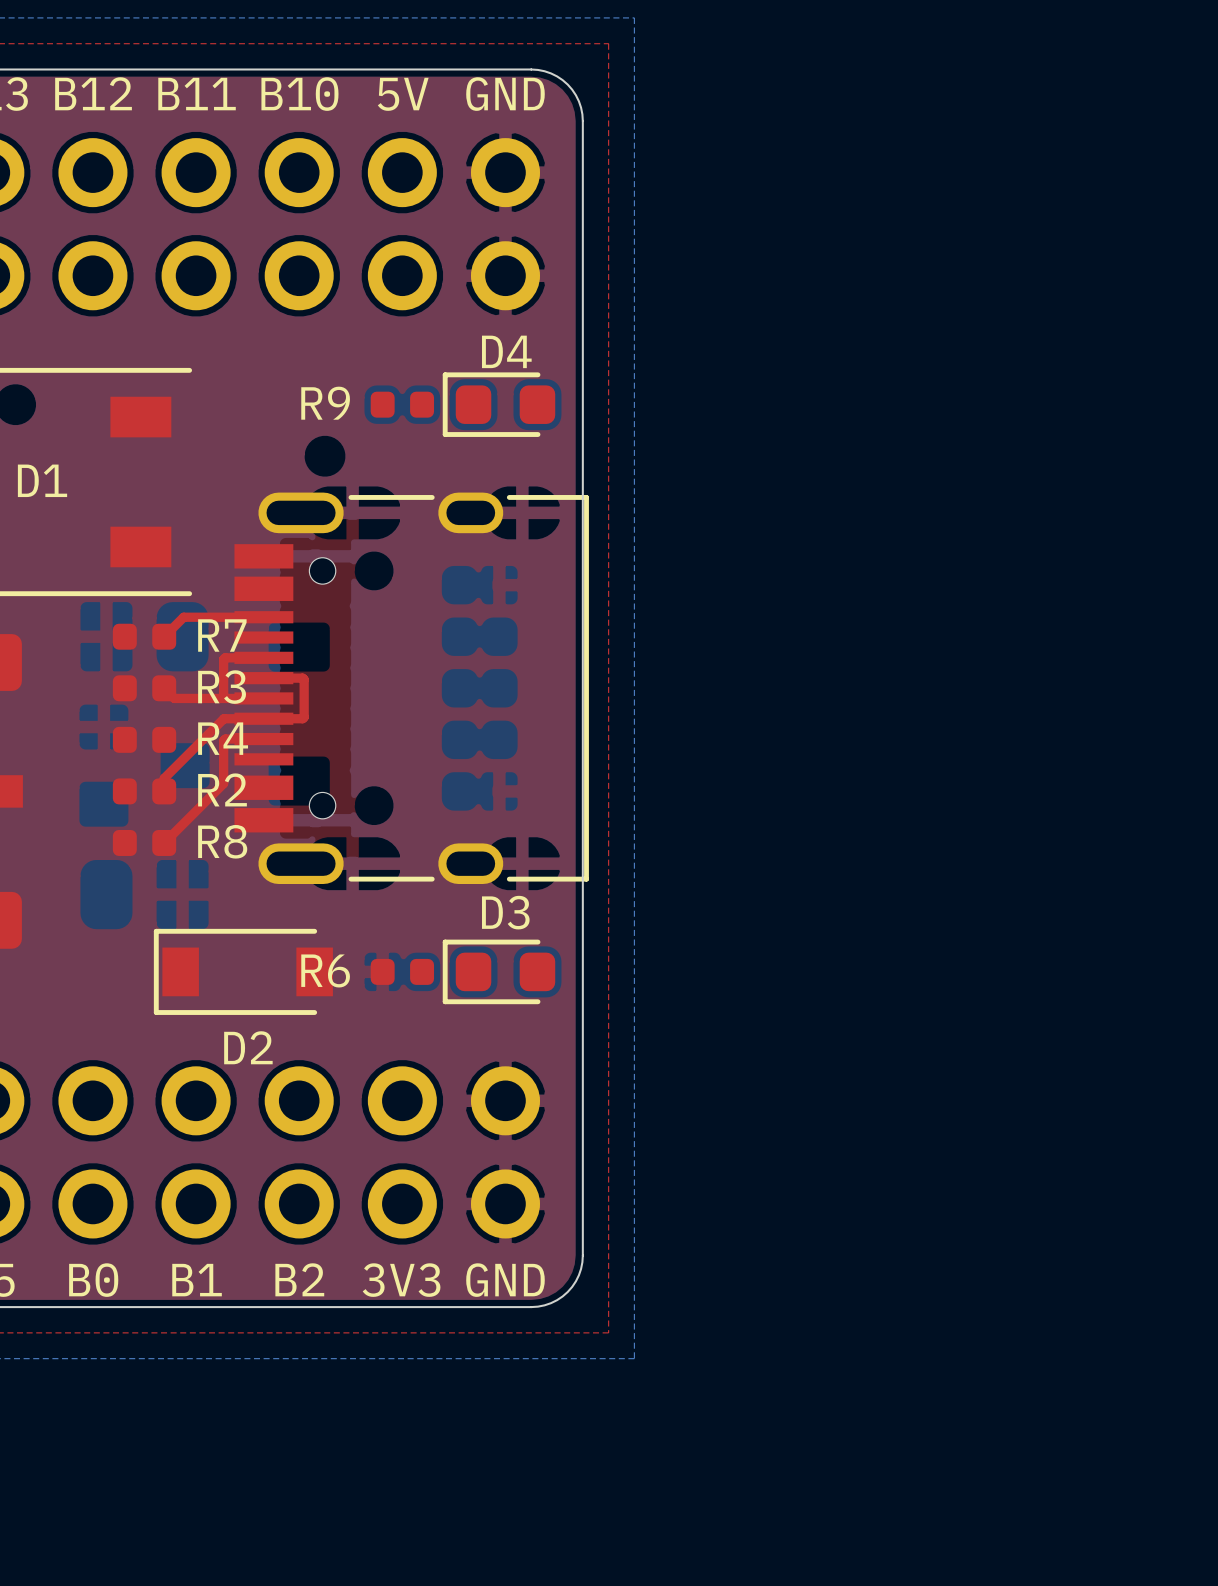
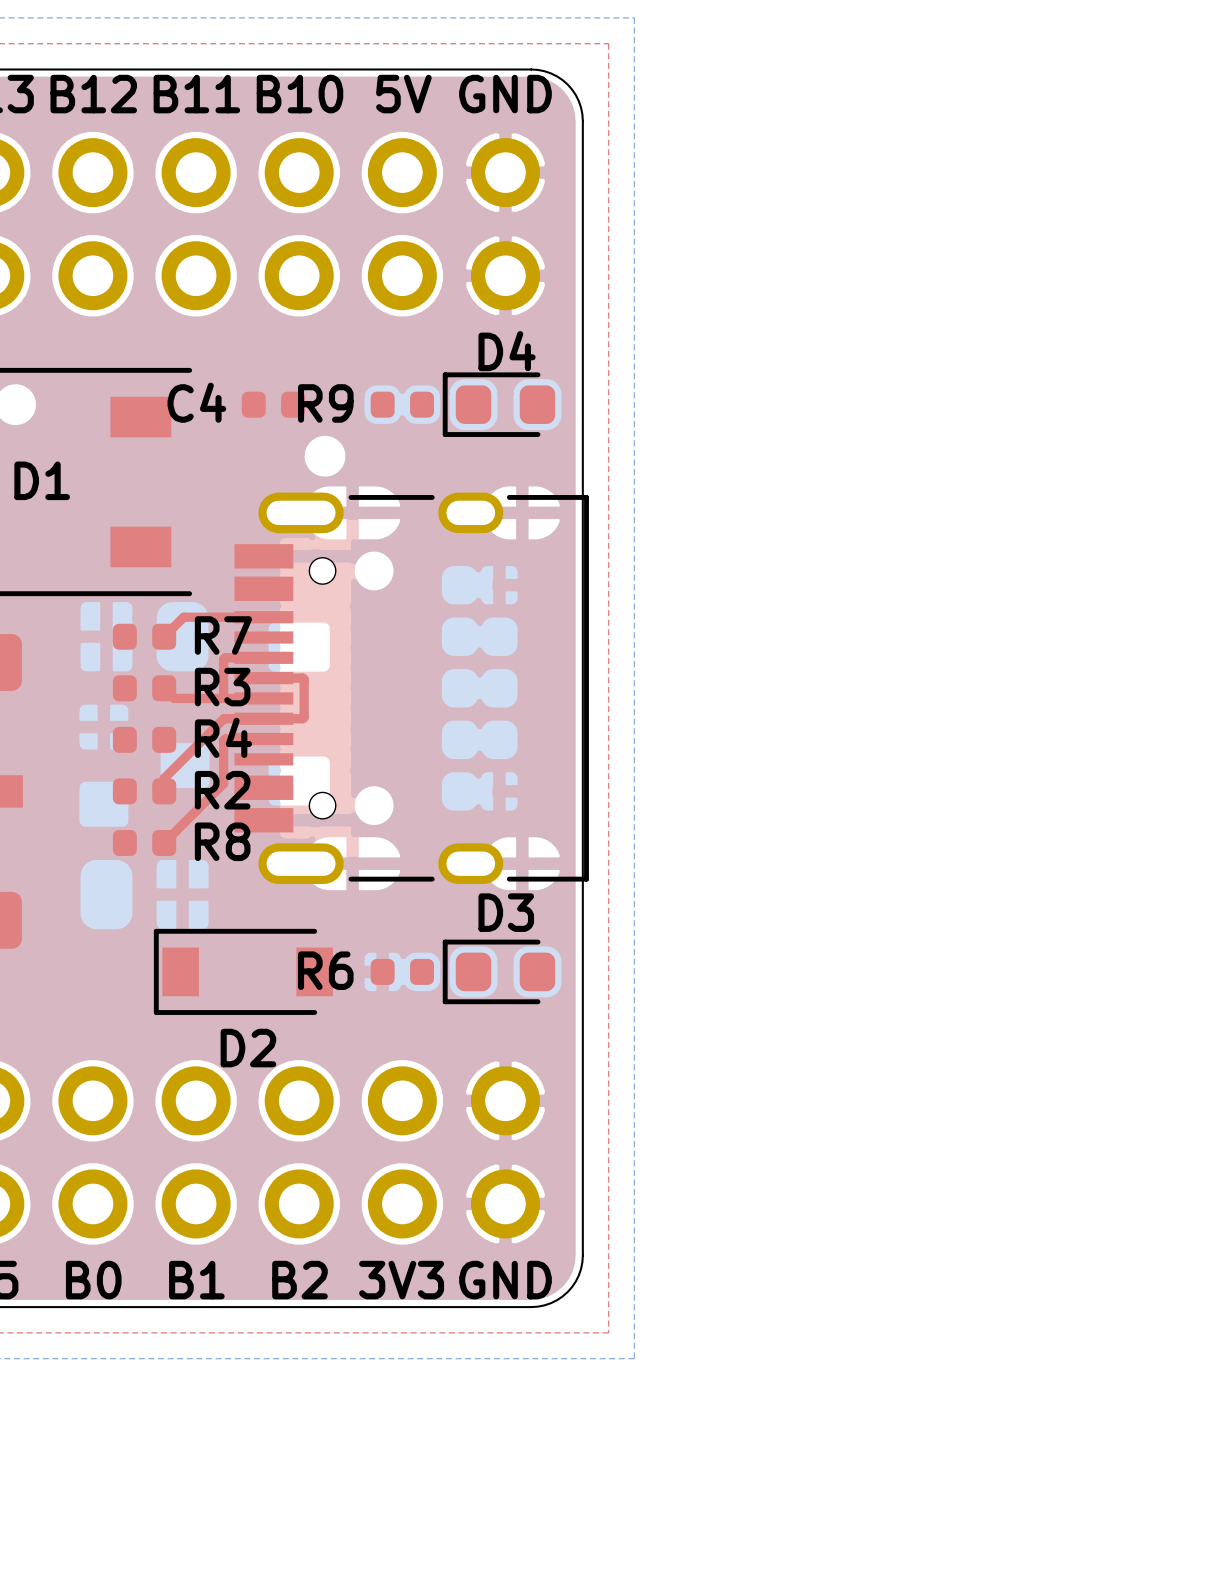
C4: none -> (273, 404)

